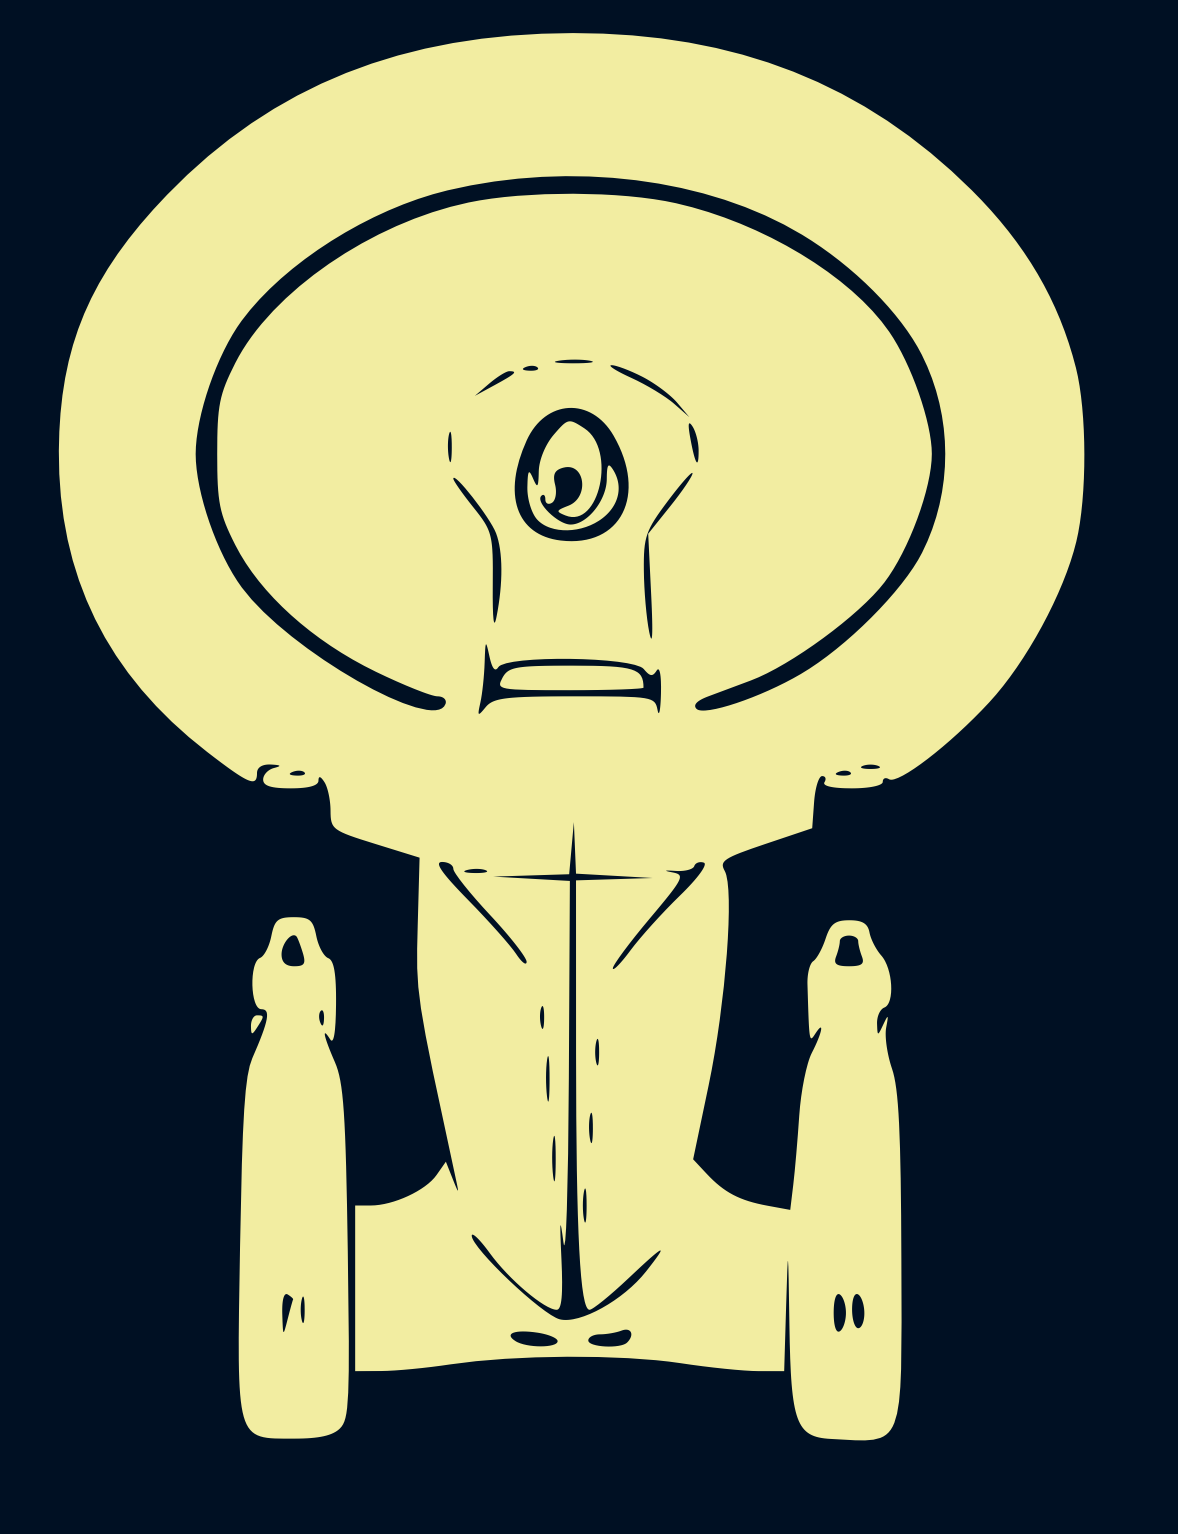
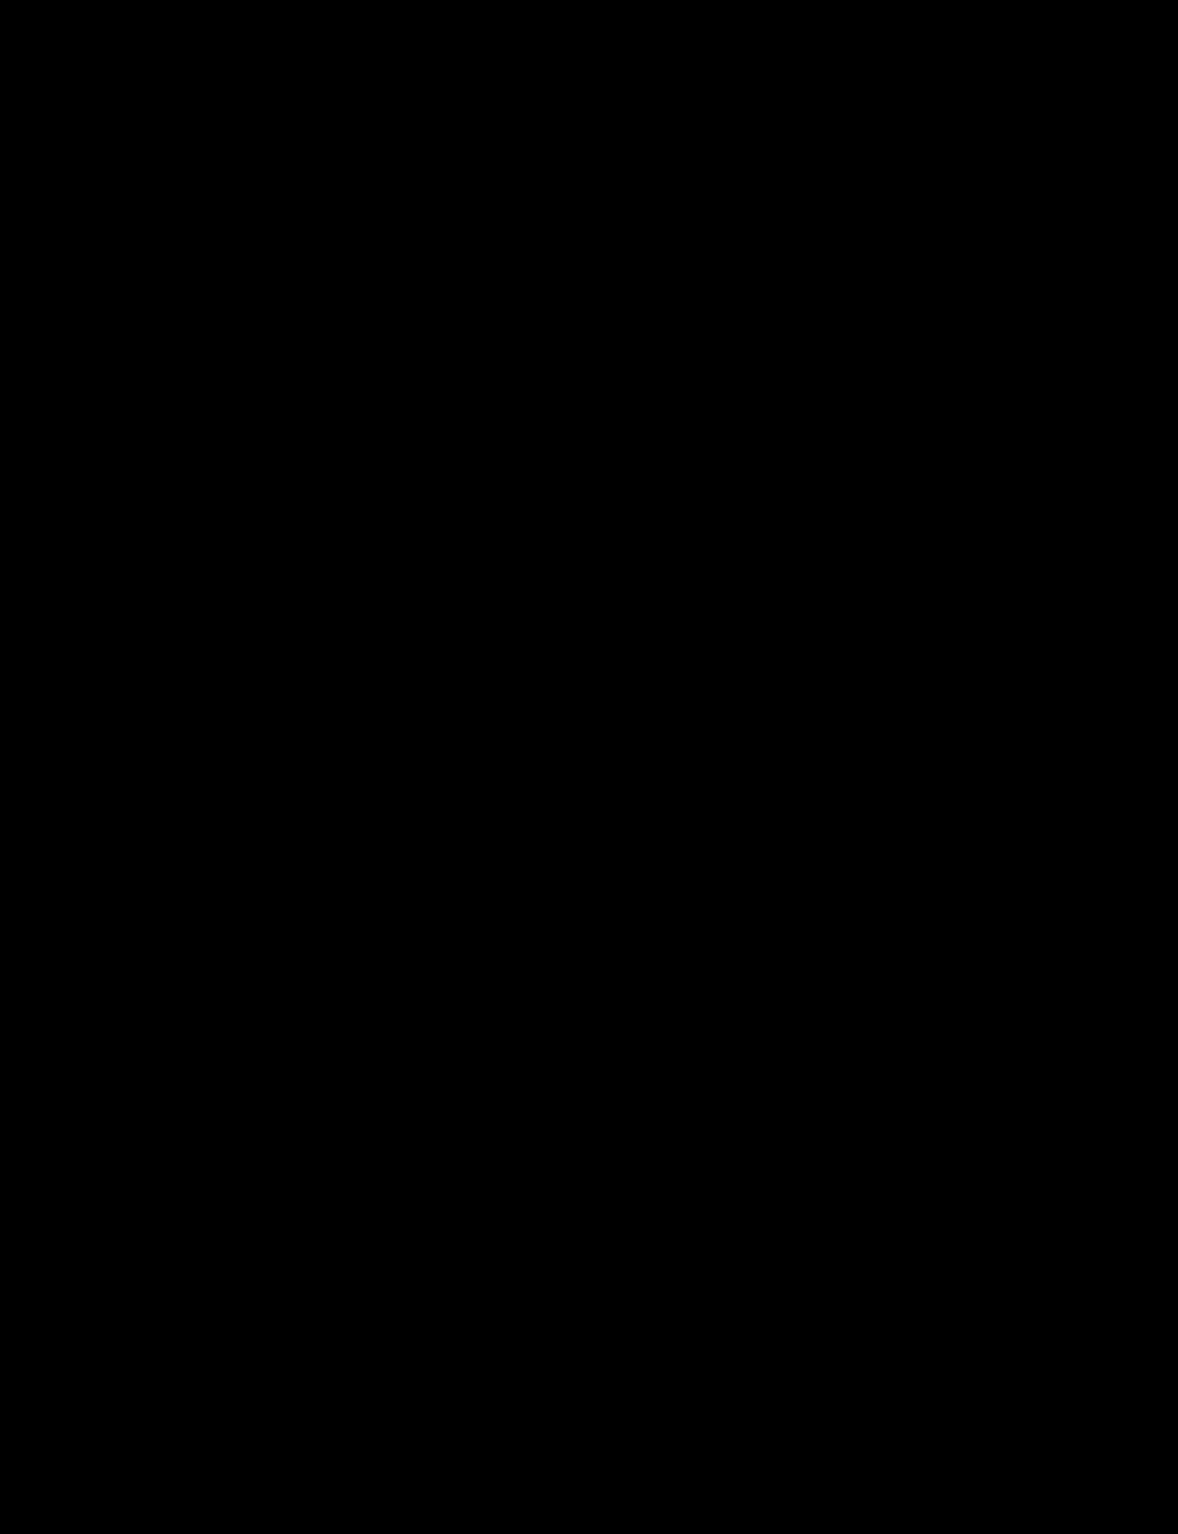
drawing: [58, 33, 1085, 1441] -> none

